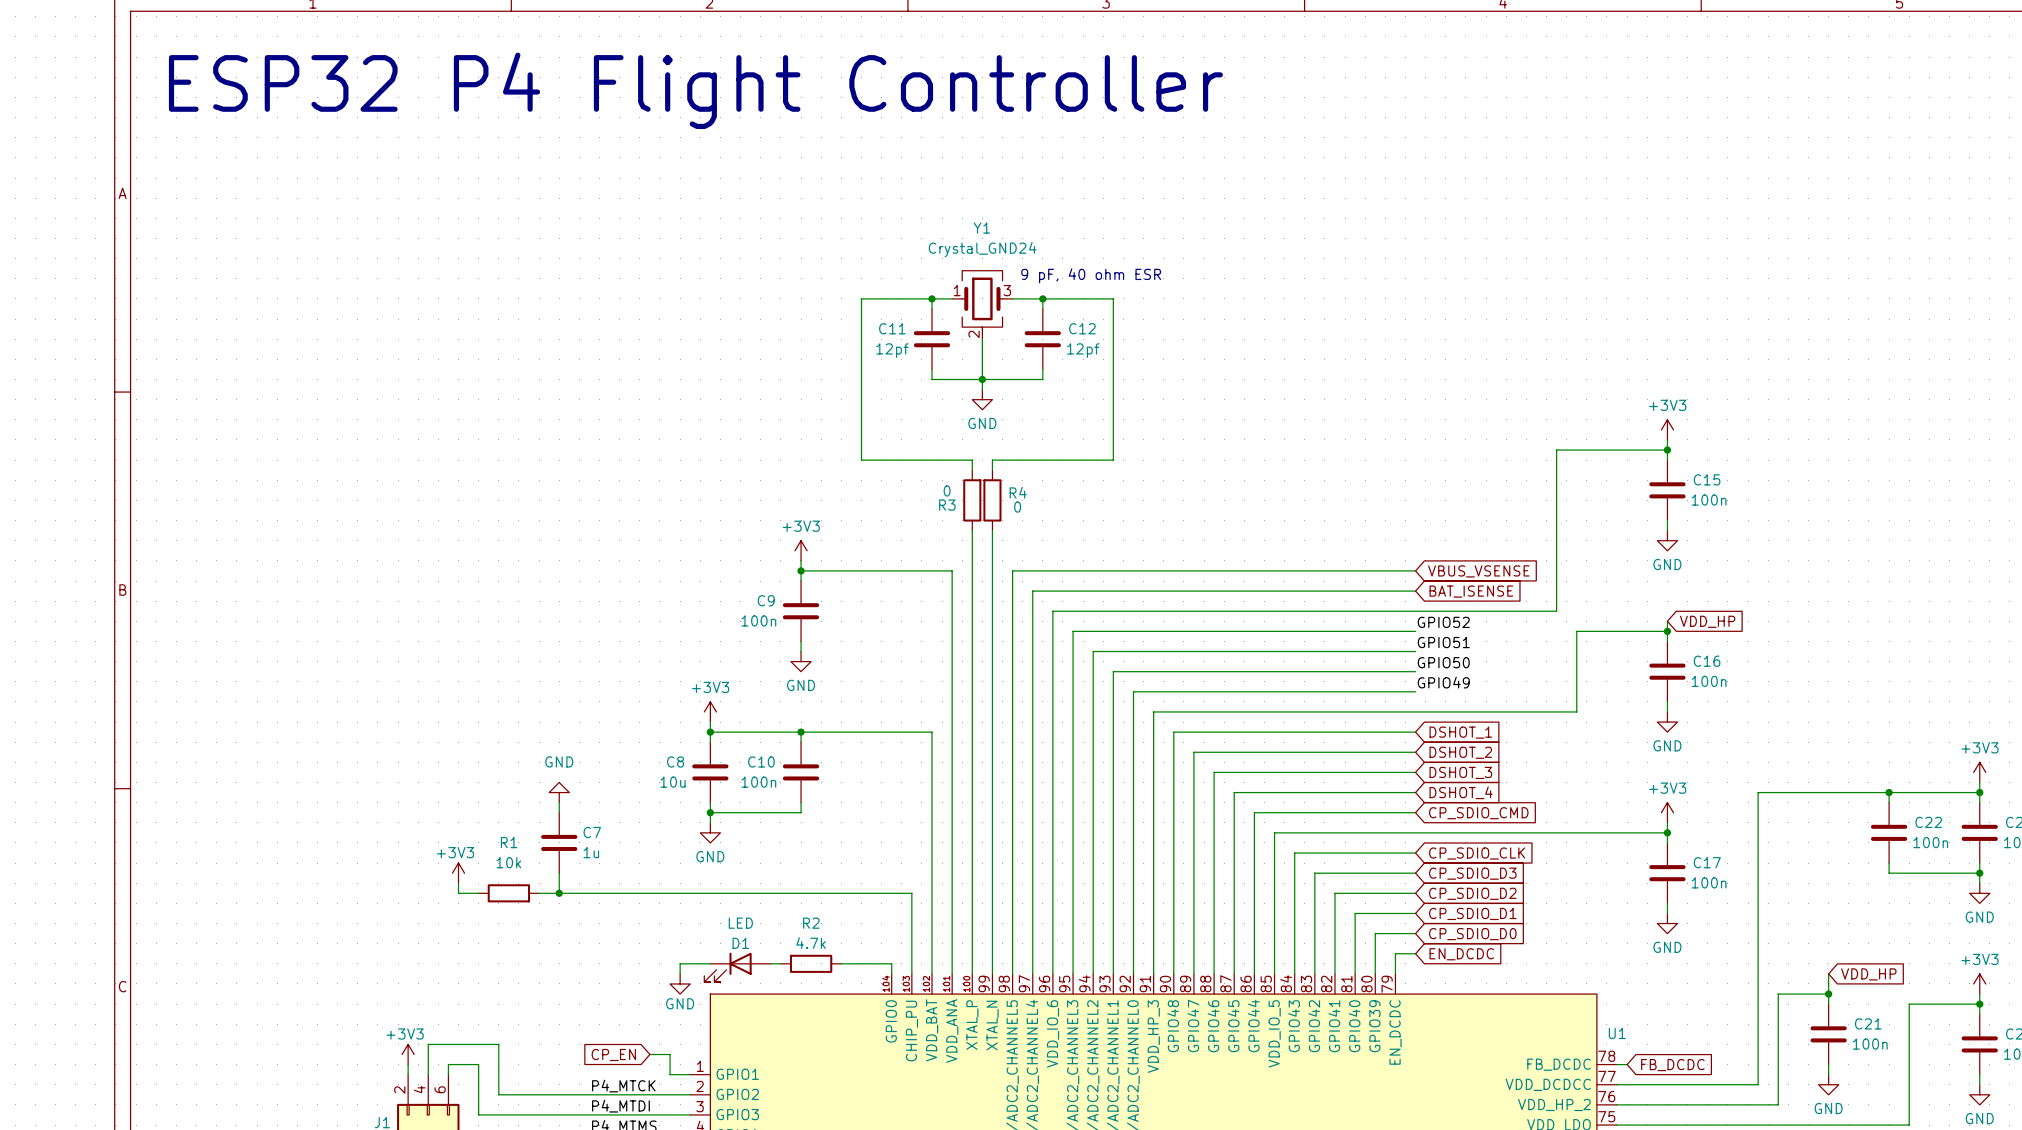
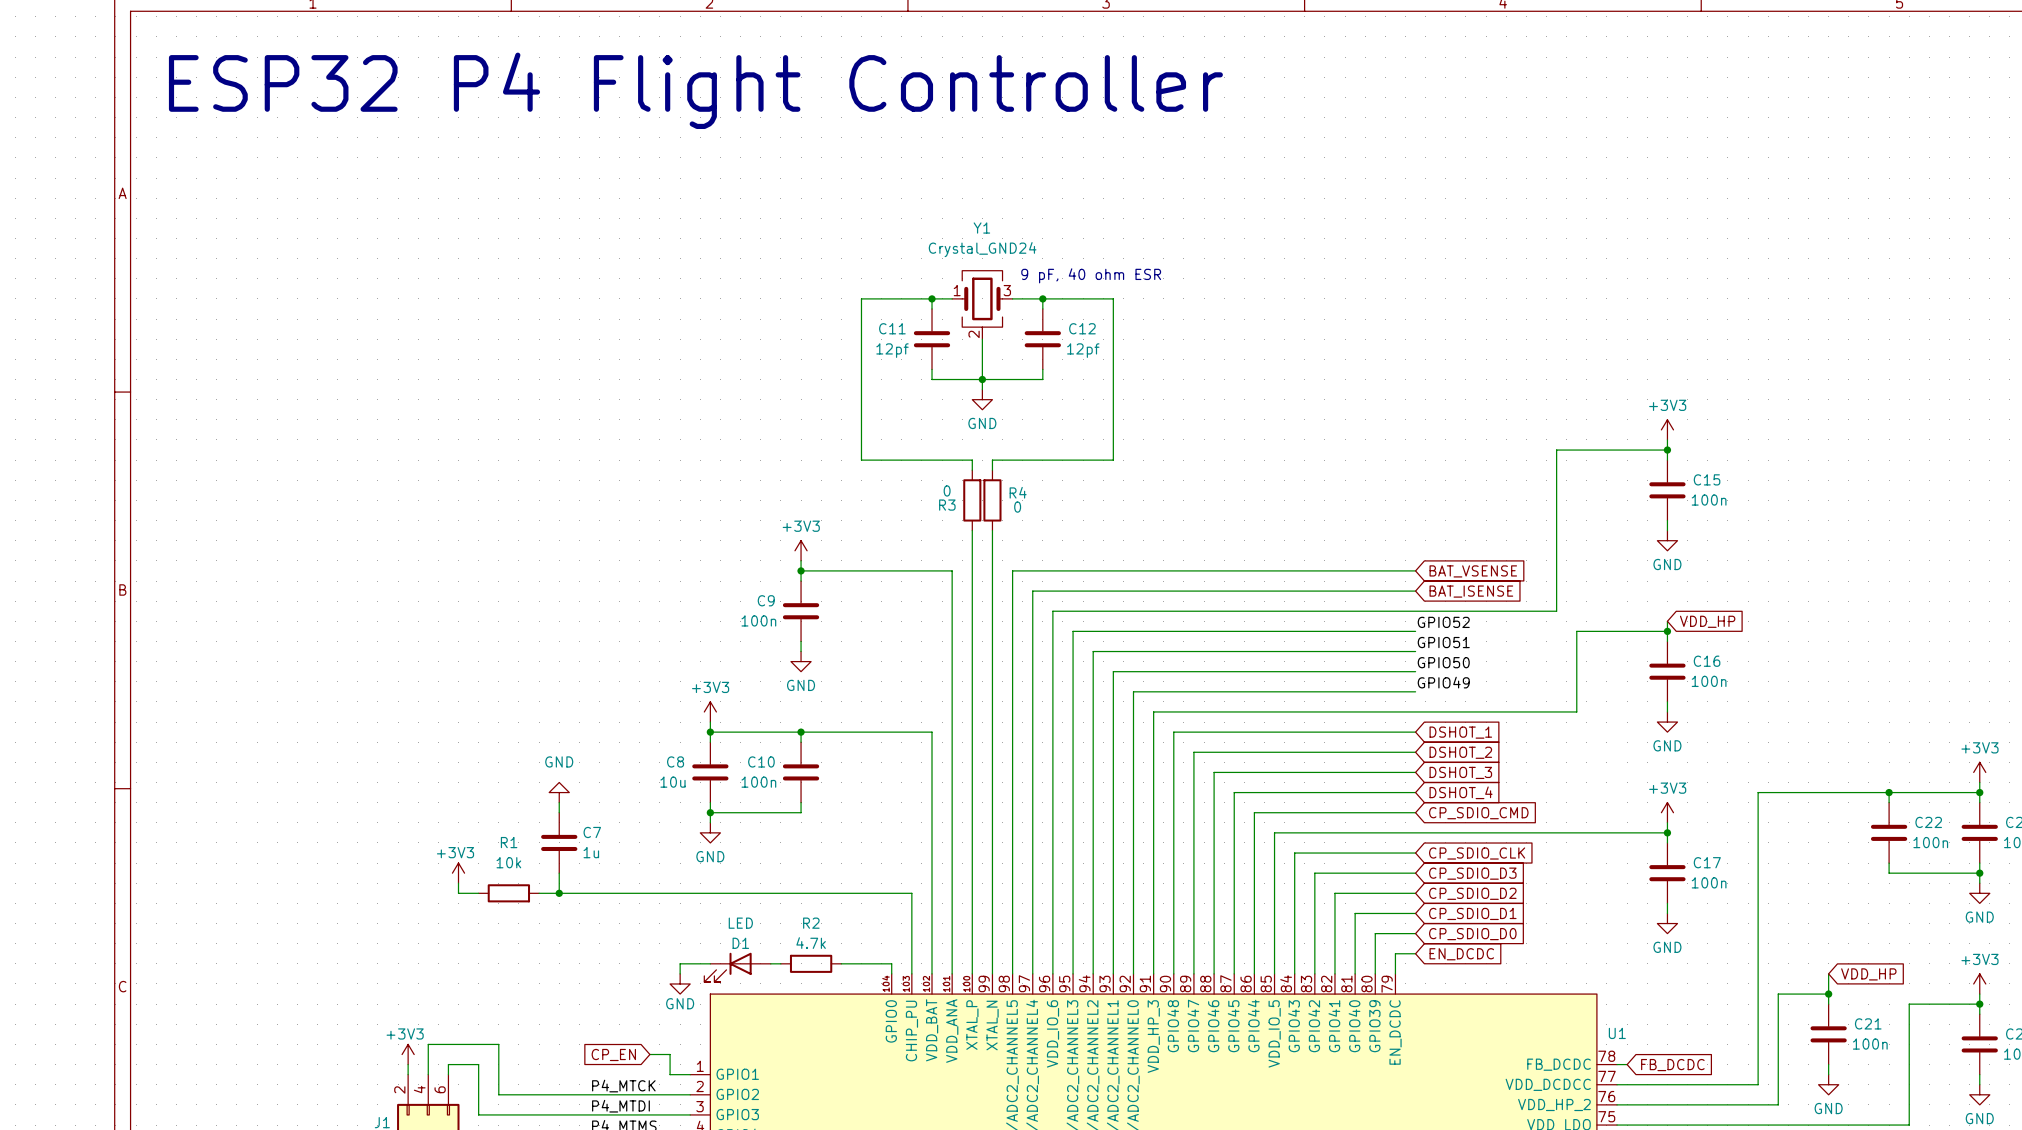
global label: VBUS_VSENSE (1478, 571) -> BAT_VSENSE (1473, 571)

